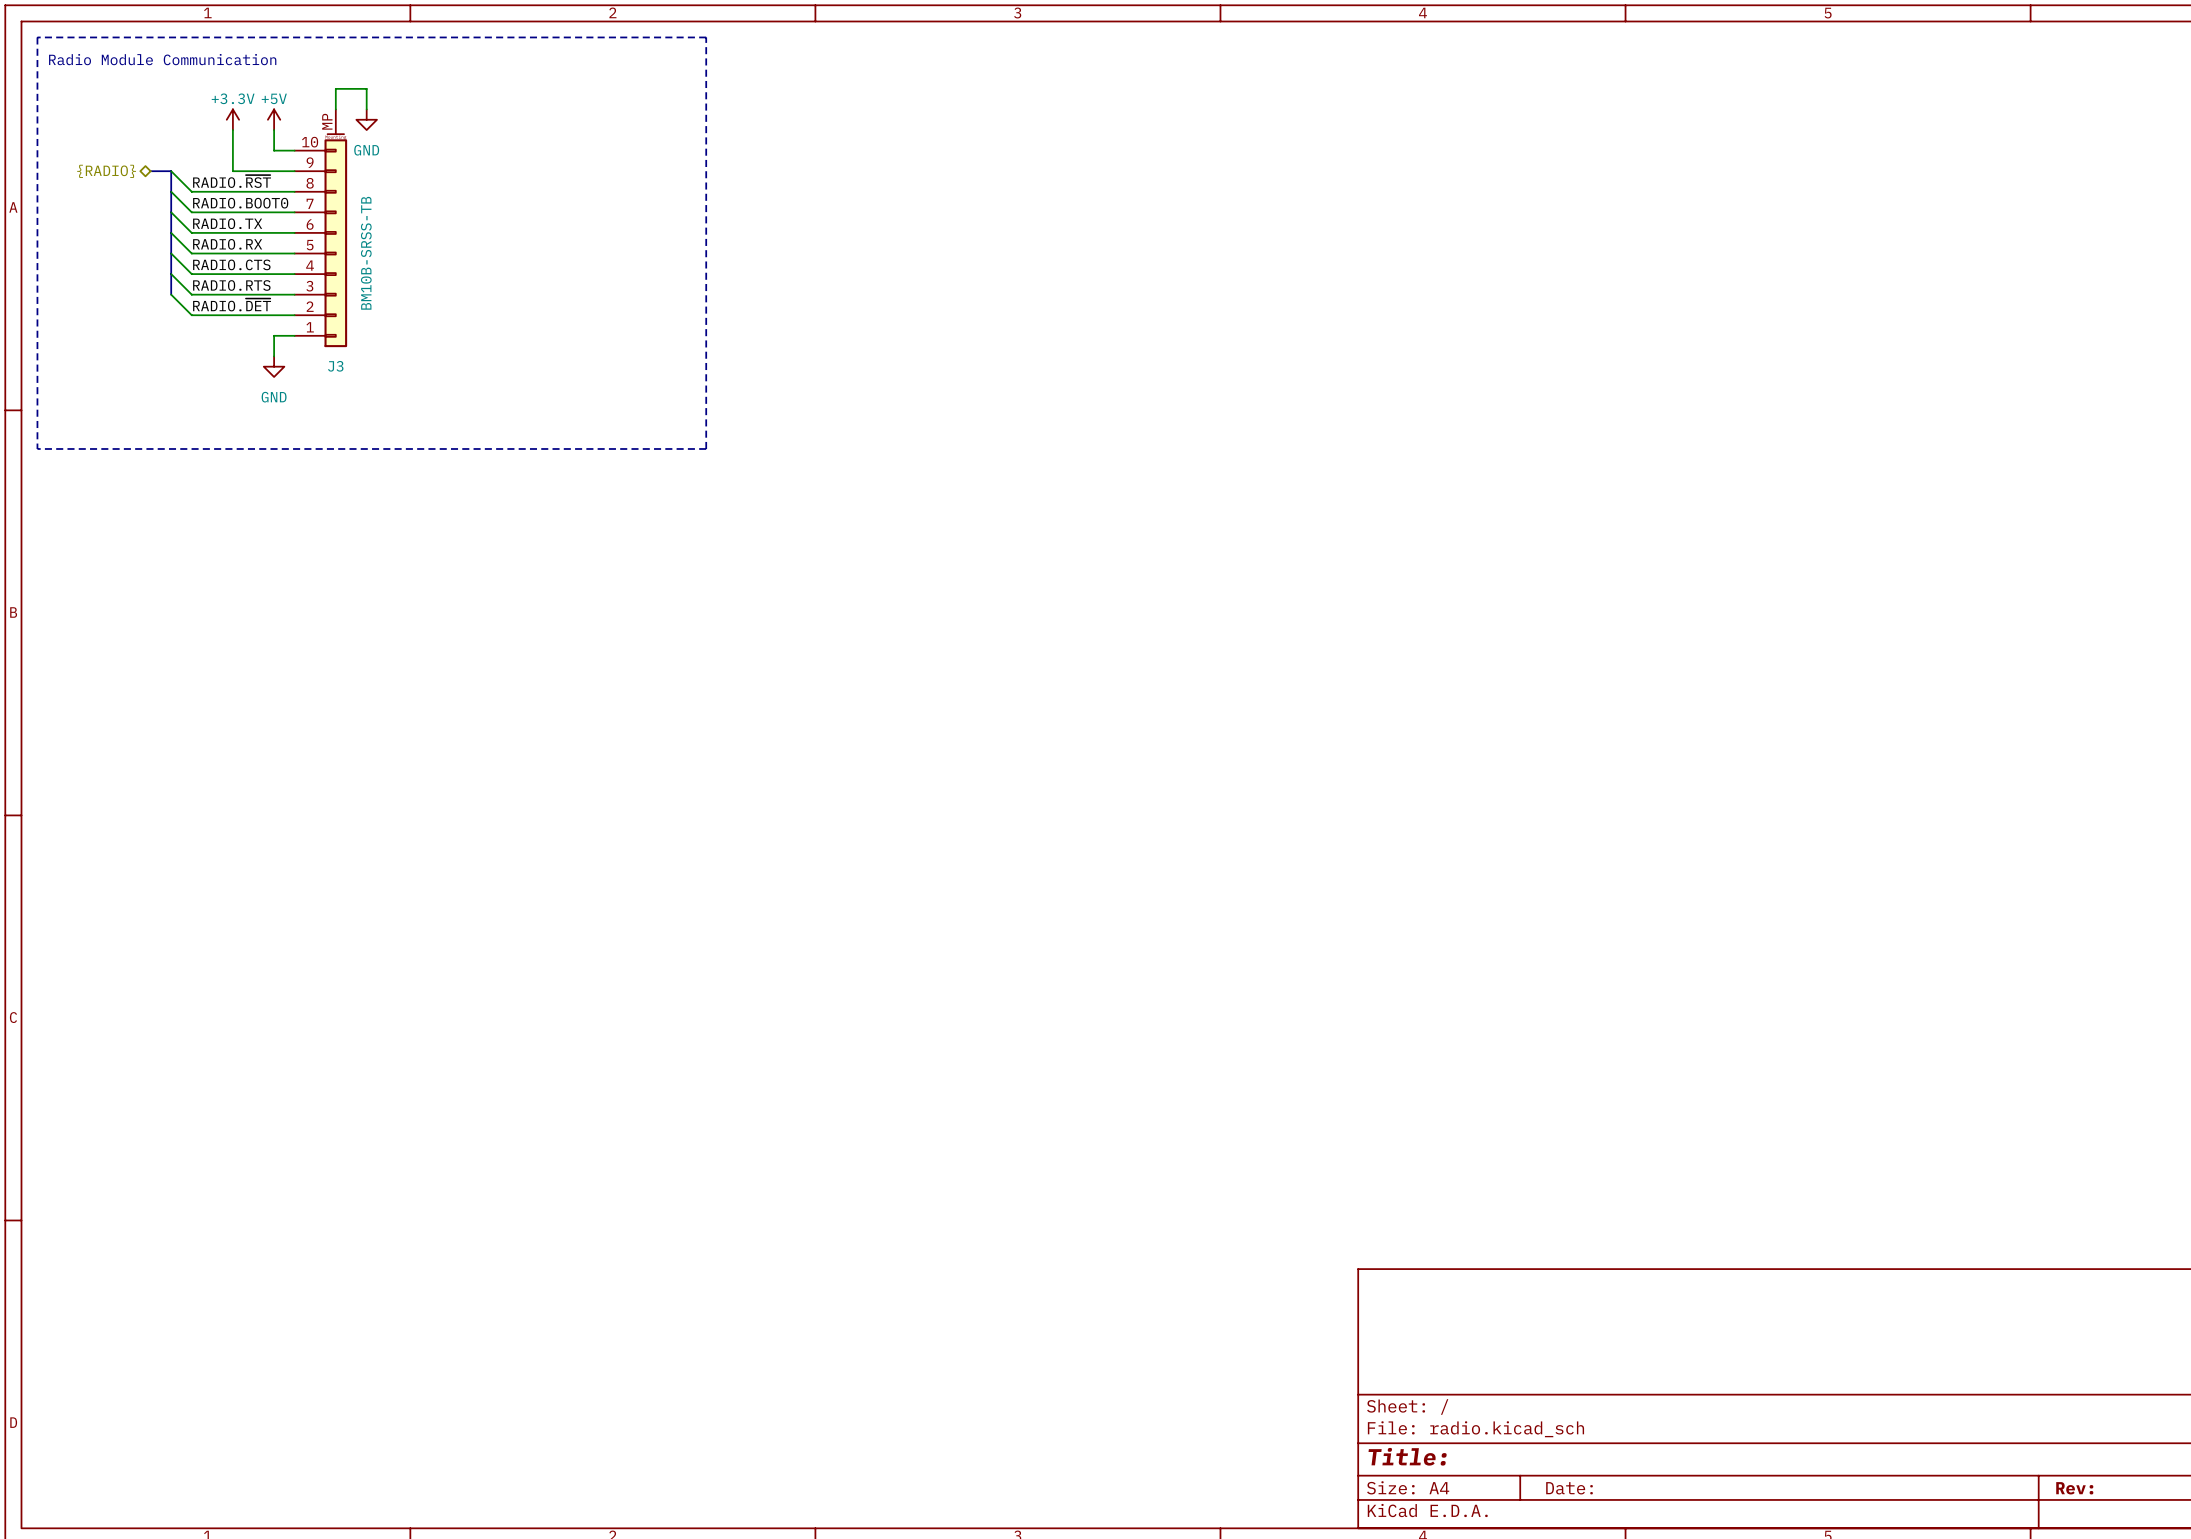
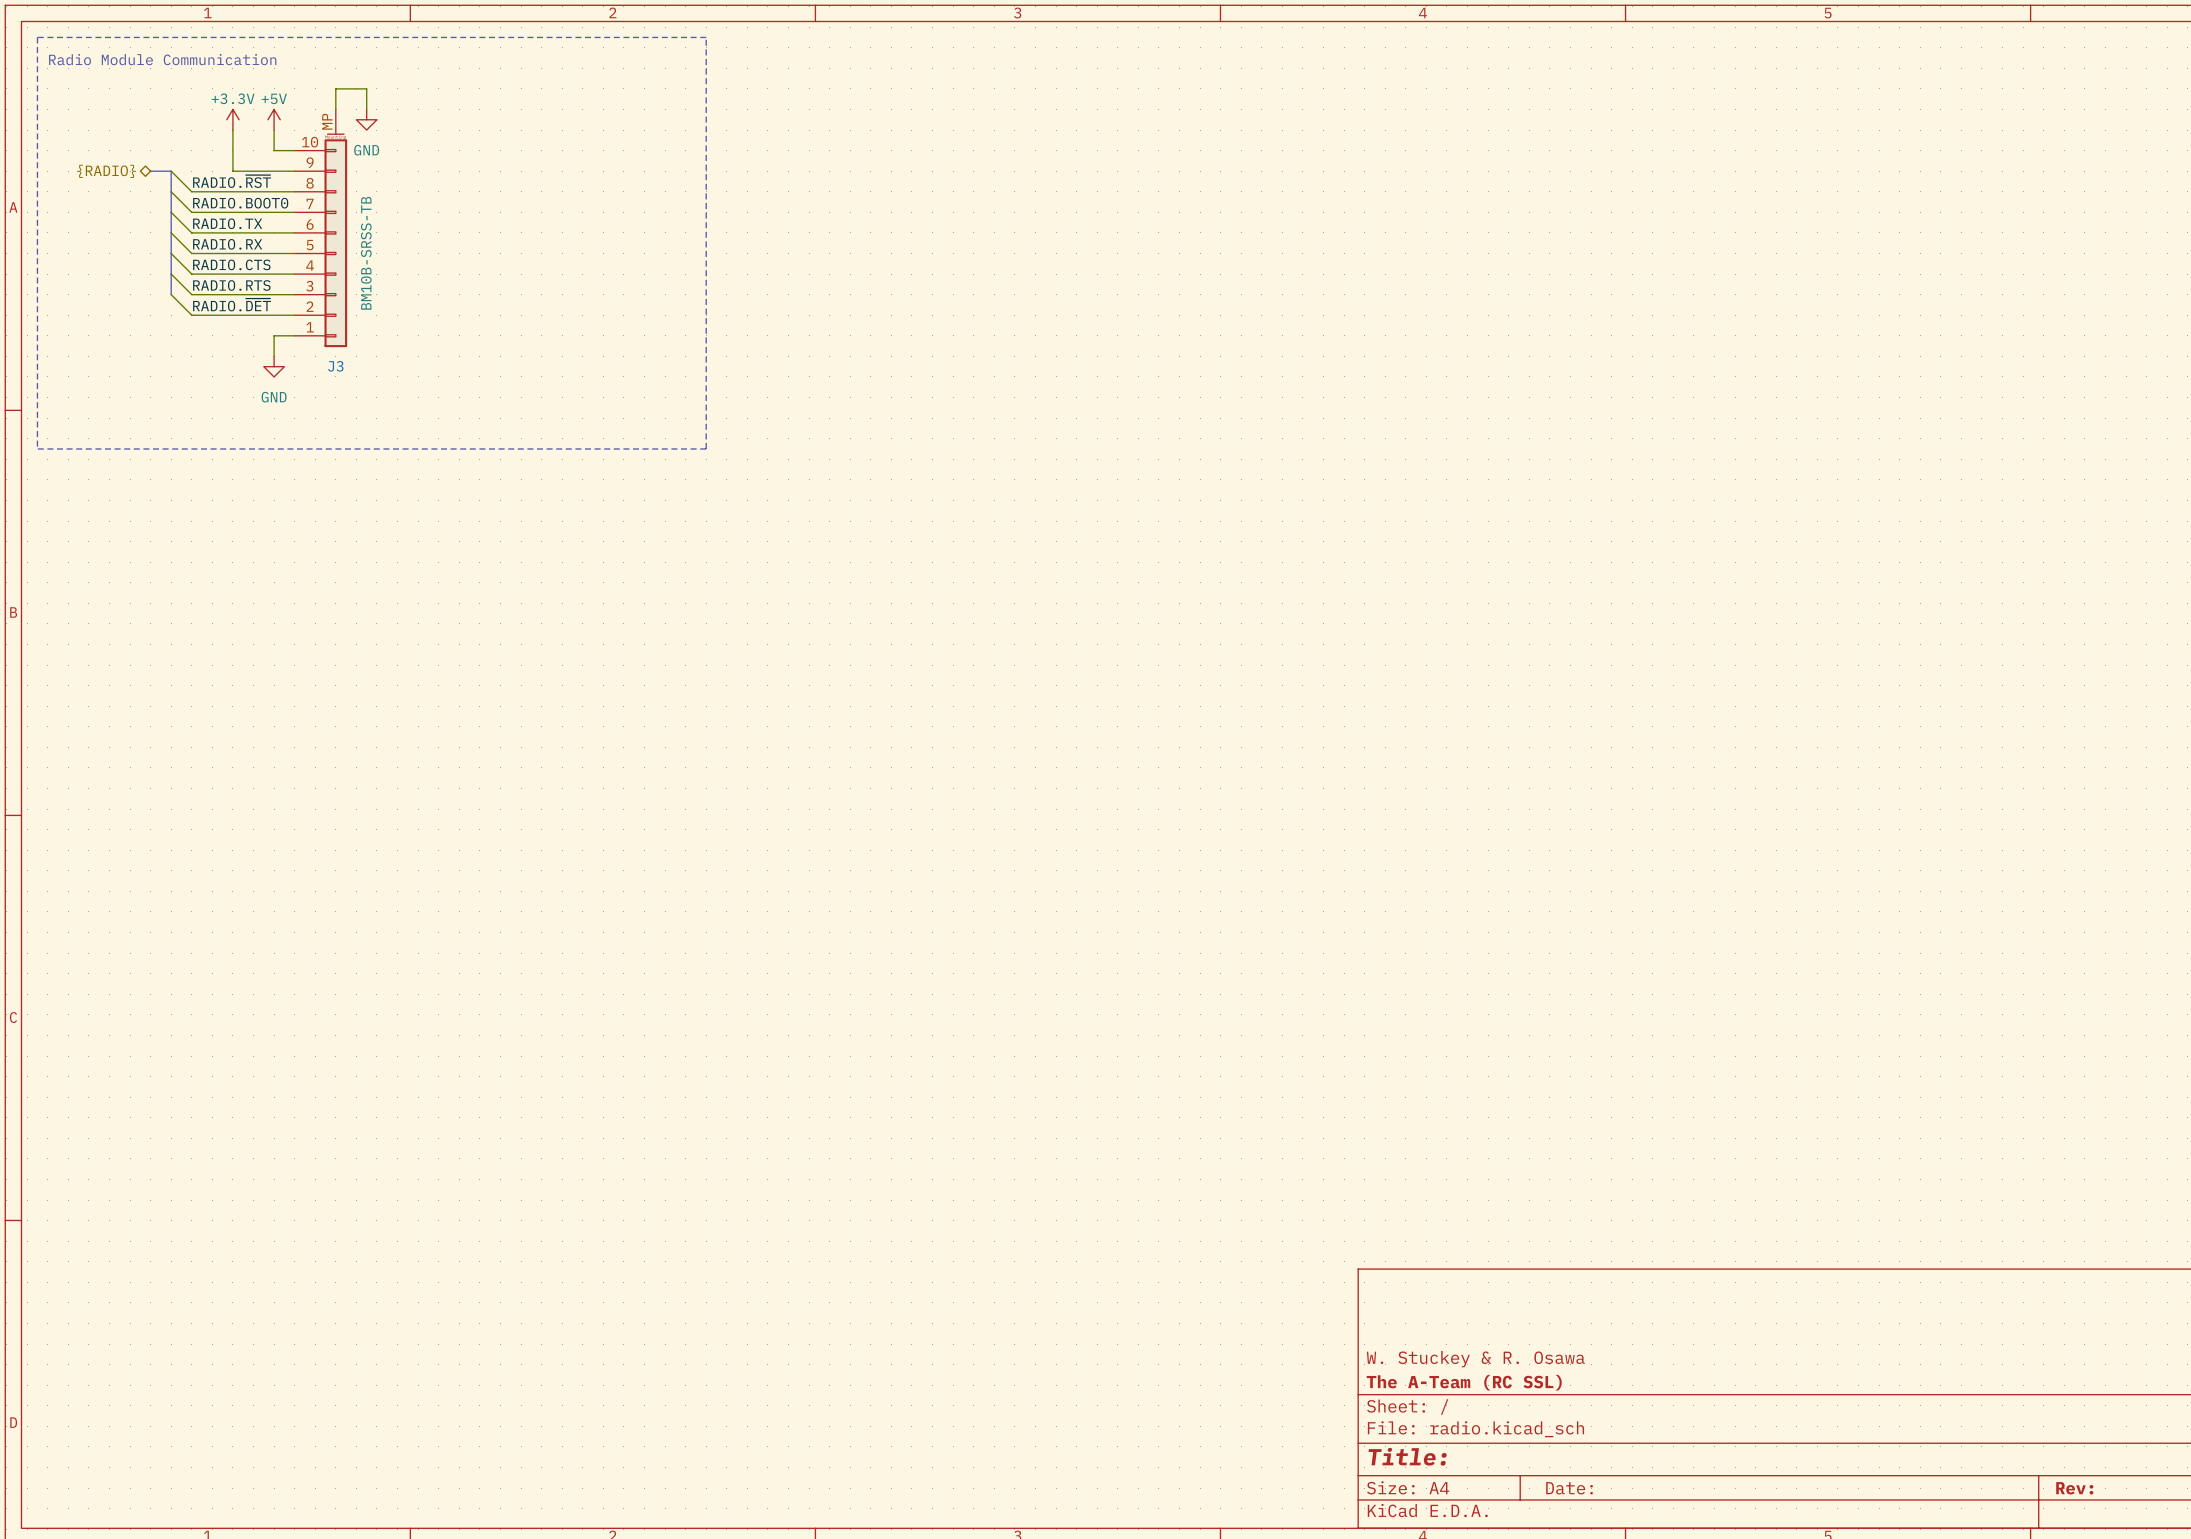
title block: none -> W. Stuckey & R. Osawa (1475, 1359)
title block: none -> The A-Team (RC SSL) (1464, 1382)

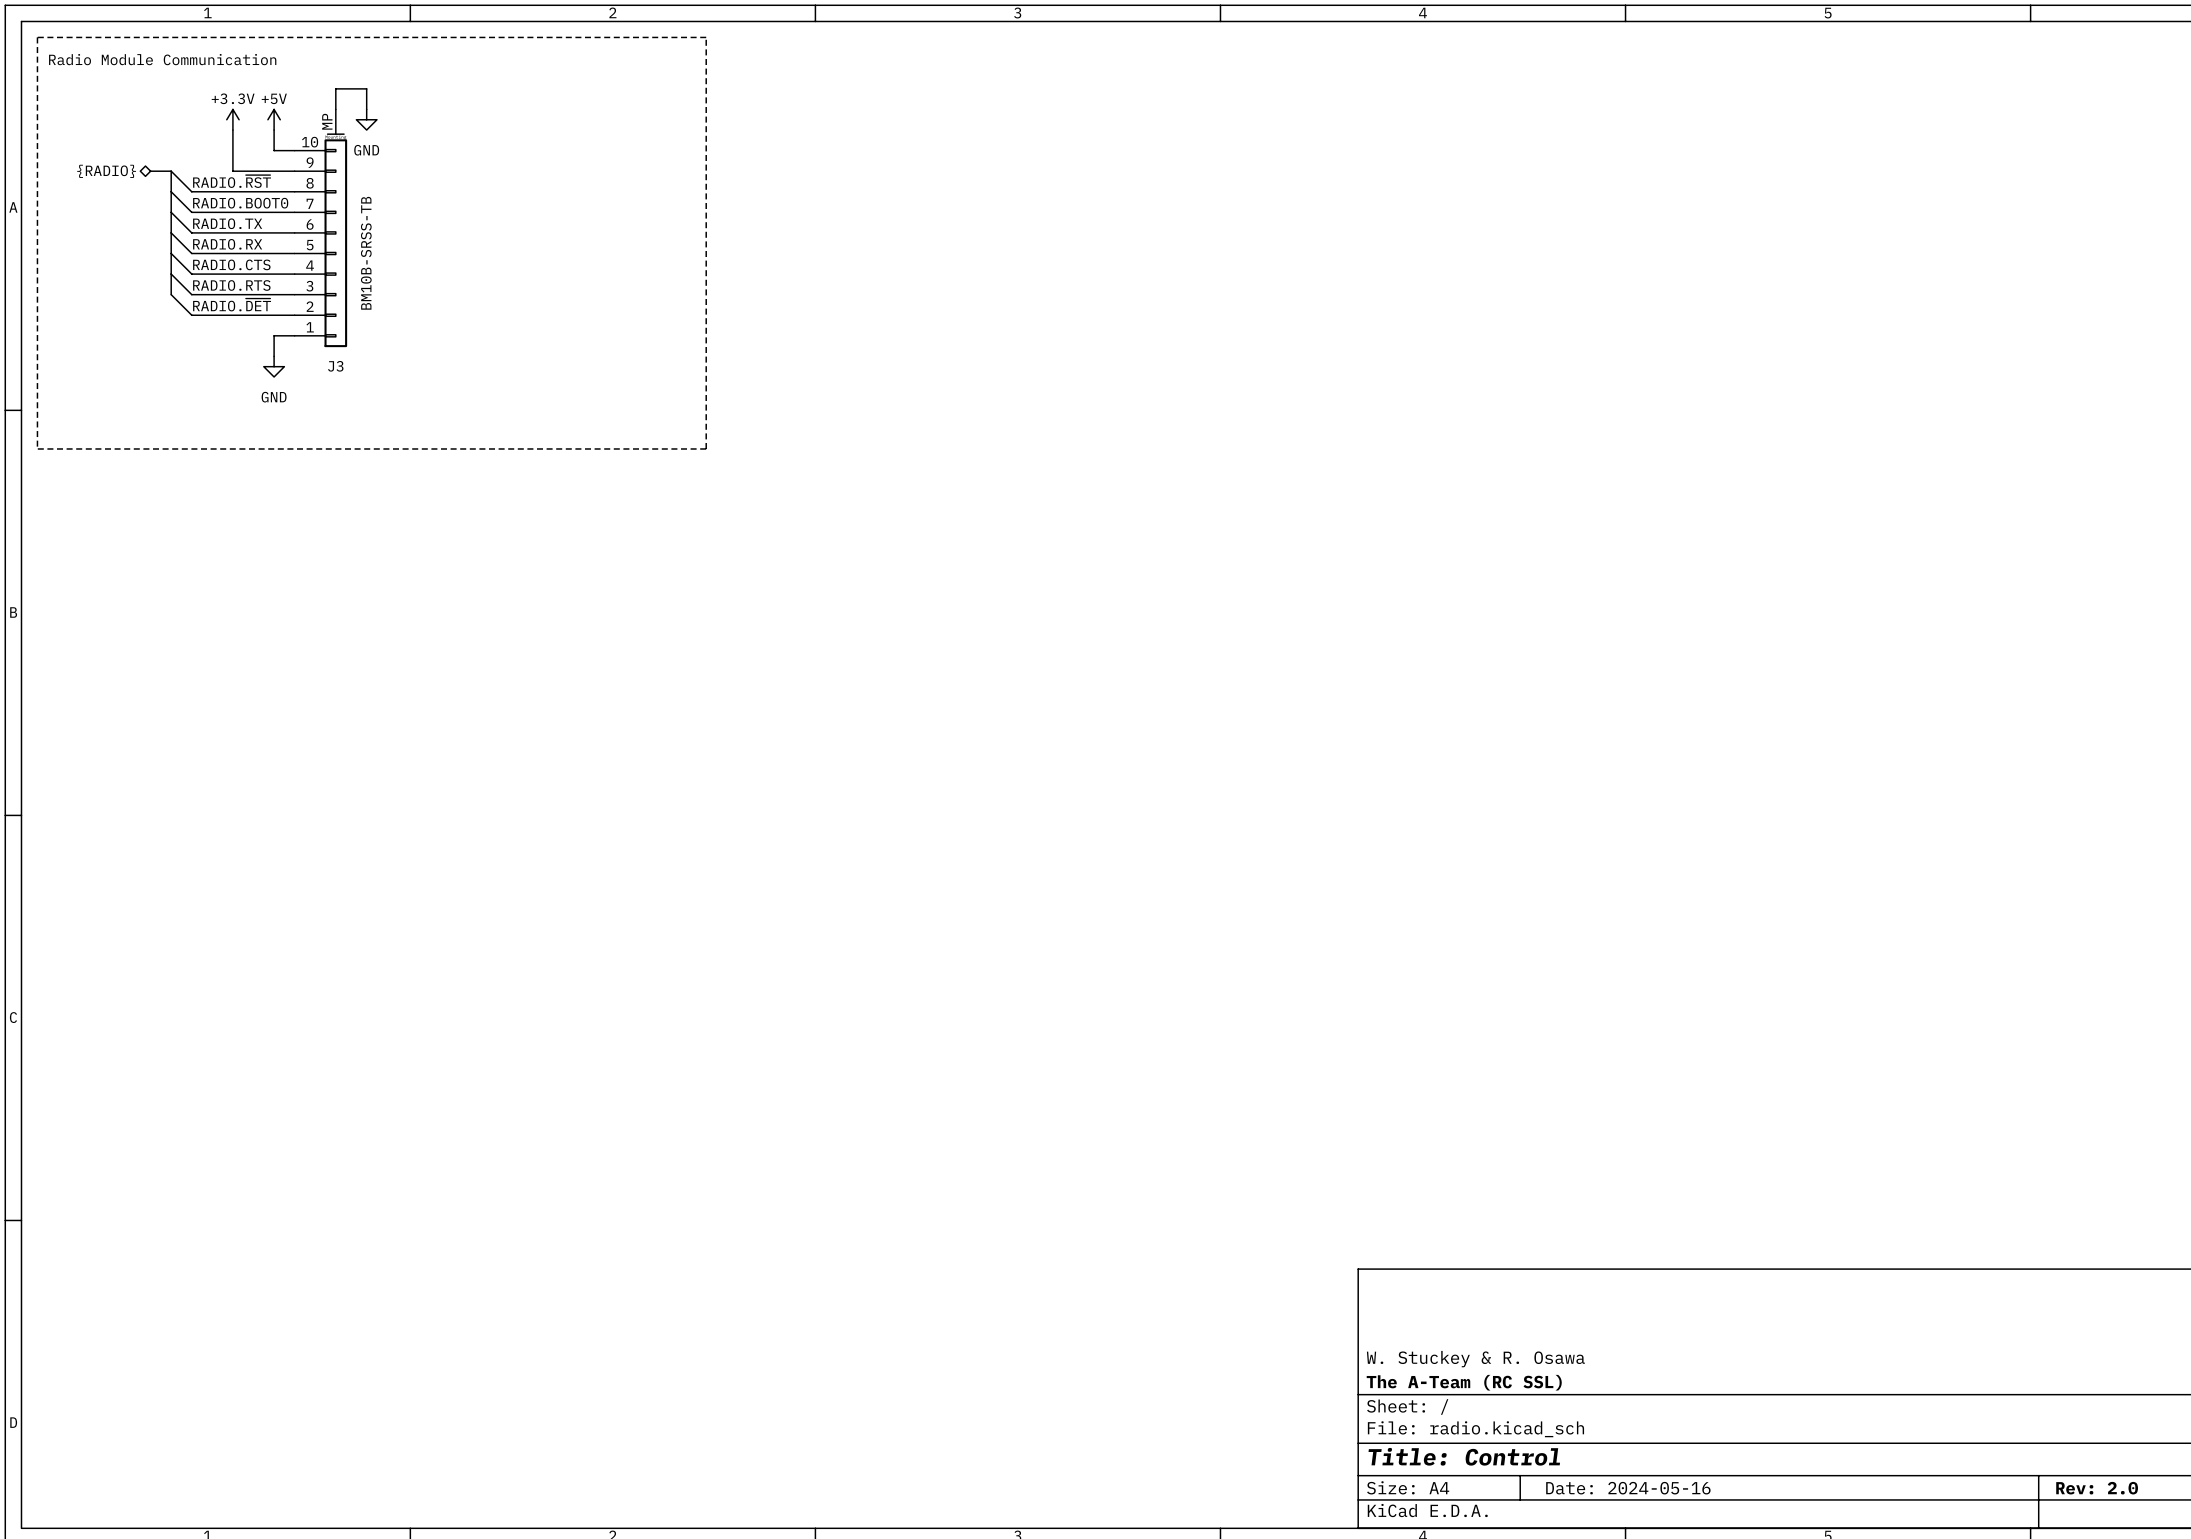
title block: Title: (1407, 1456) -> Title: Control (1464, 1456)
title block: Date: (1569, 1488) -> Date: 2024-05-16 (1628, 1488)
title block: Rev: (2074, 1488) -> Rev: 2.0 (2097, 1488)

